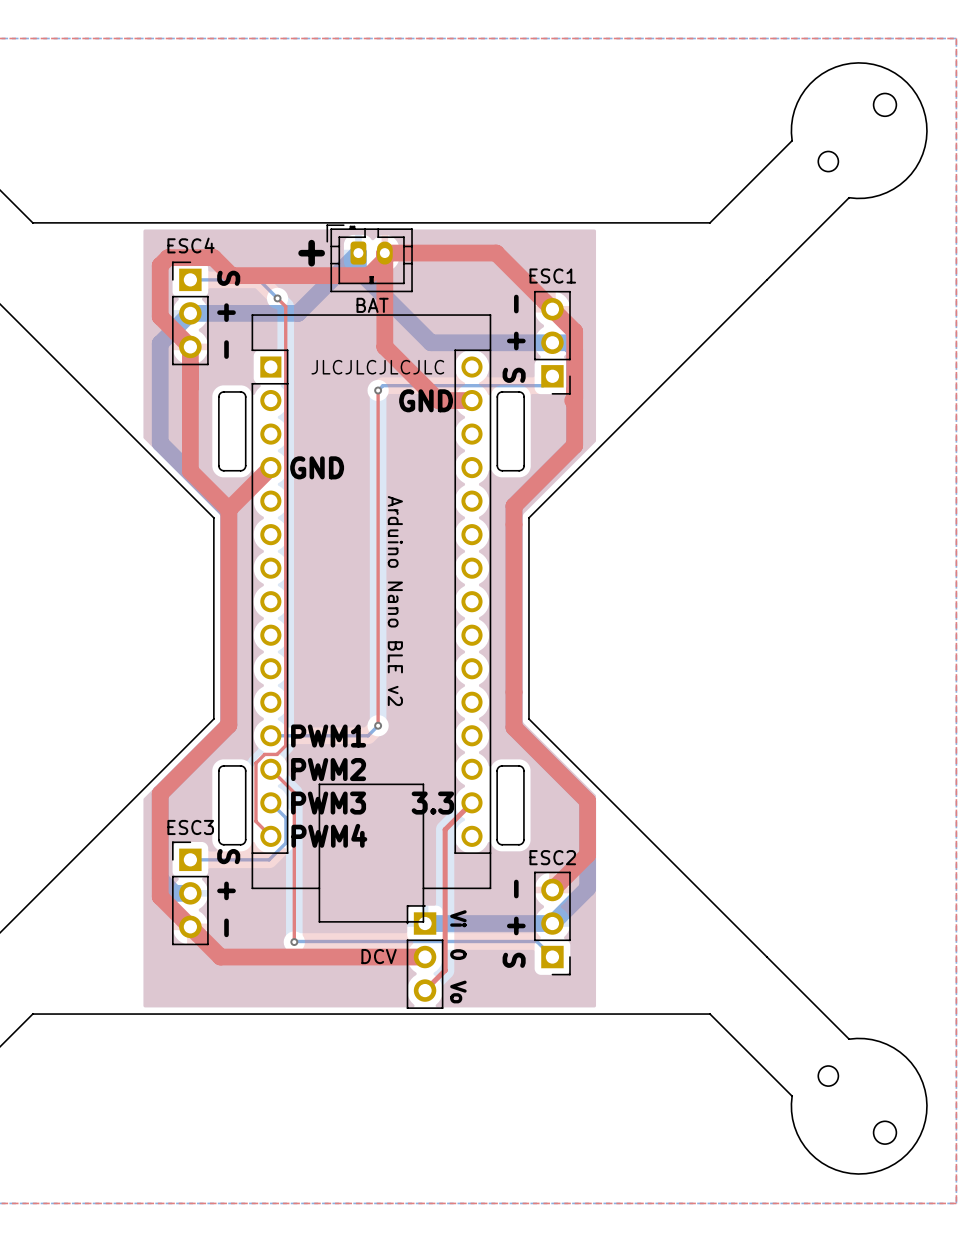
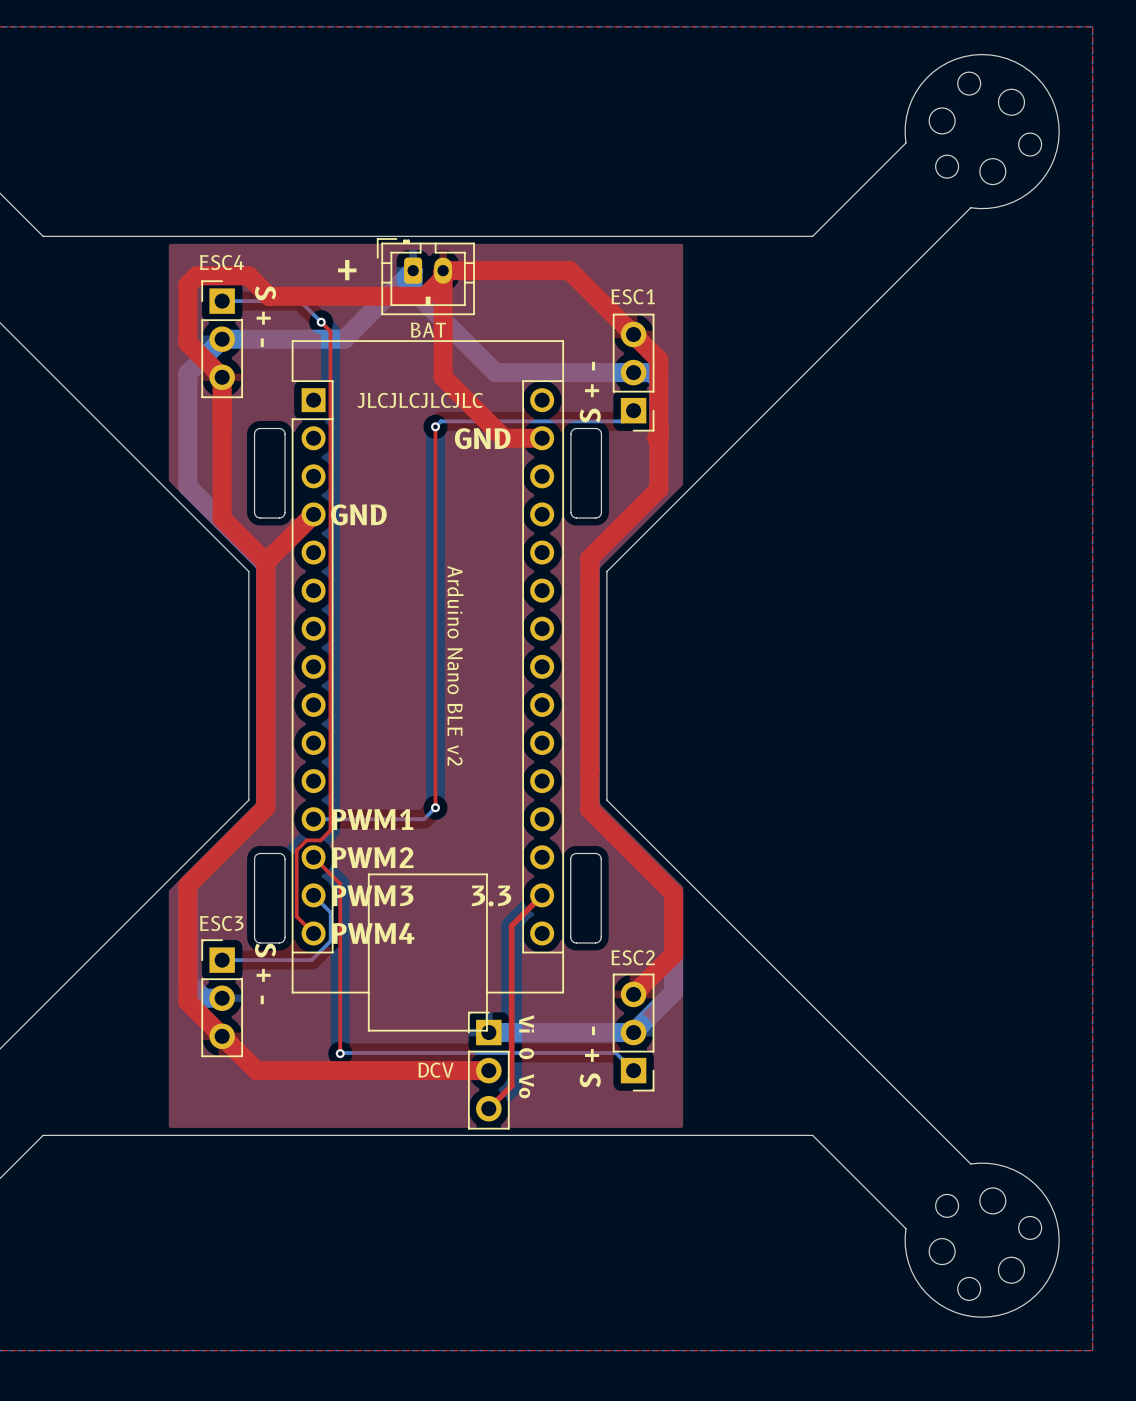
round board edge: none -> [957, 71, 982, 96]
round board edge: none -> [928, 107, 956, 135]
round board edge: none -> [1018, 132, 1042, 157]
round board edge: none -> [979, 158, 1007, 185]
round board edge: none -> [979, 1187, 1007, 1215]
round board edge: none -> [1018, 1216, 1042, 1240]
round board edge: none -> [928, 1238, 956, 1265]
round board edge: none -> [957, 1277, 982, 1301]

